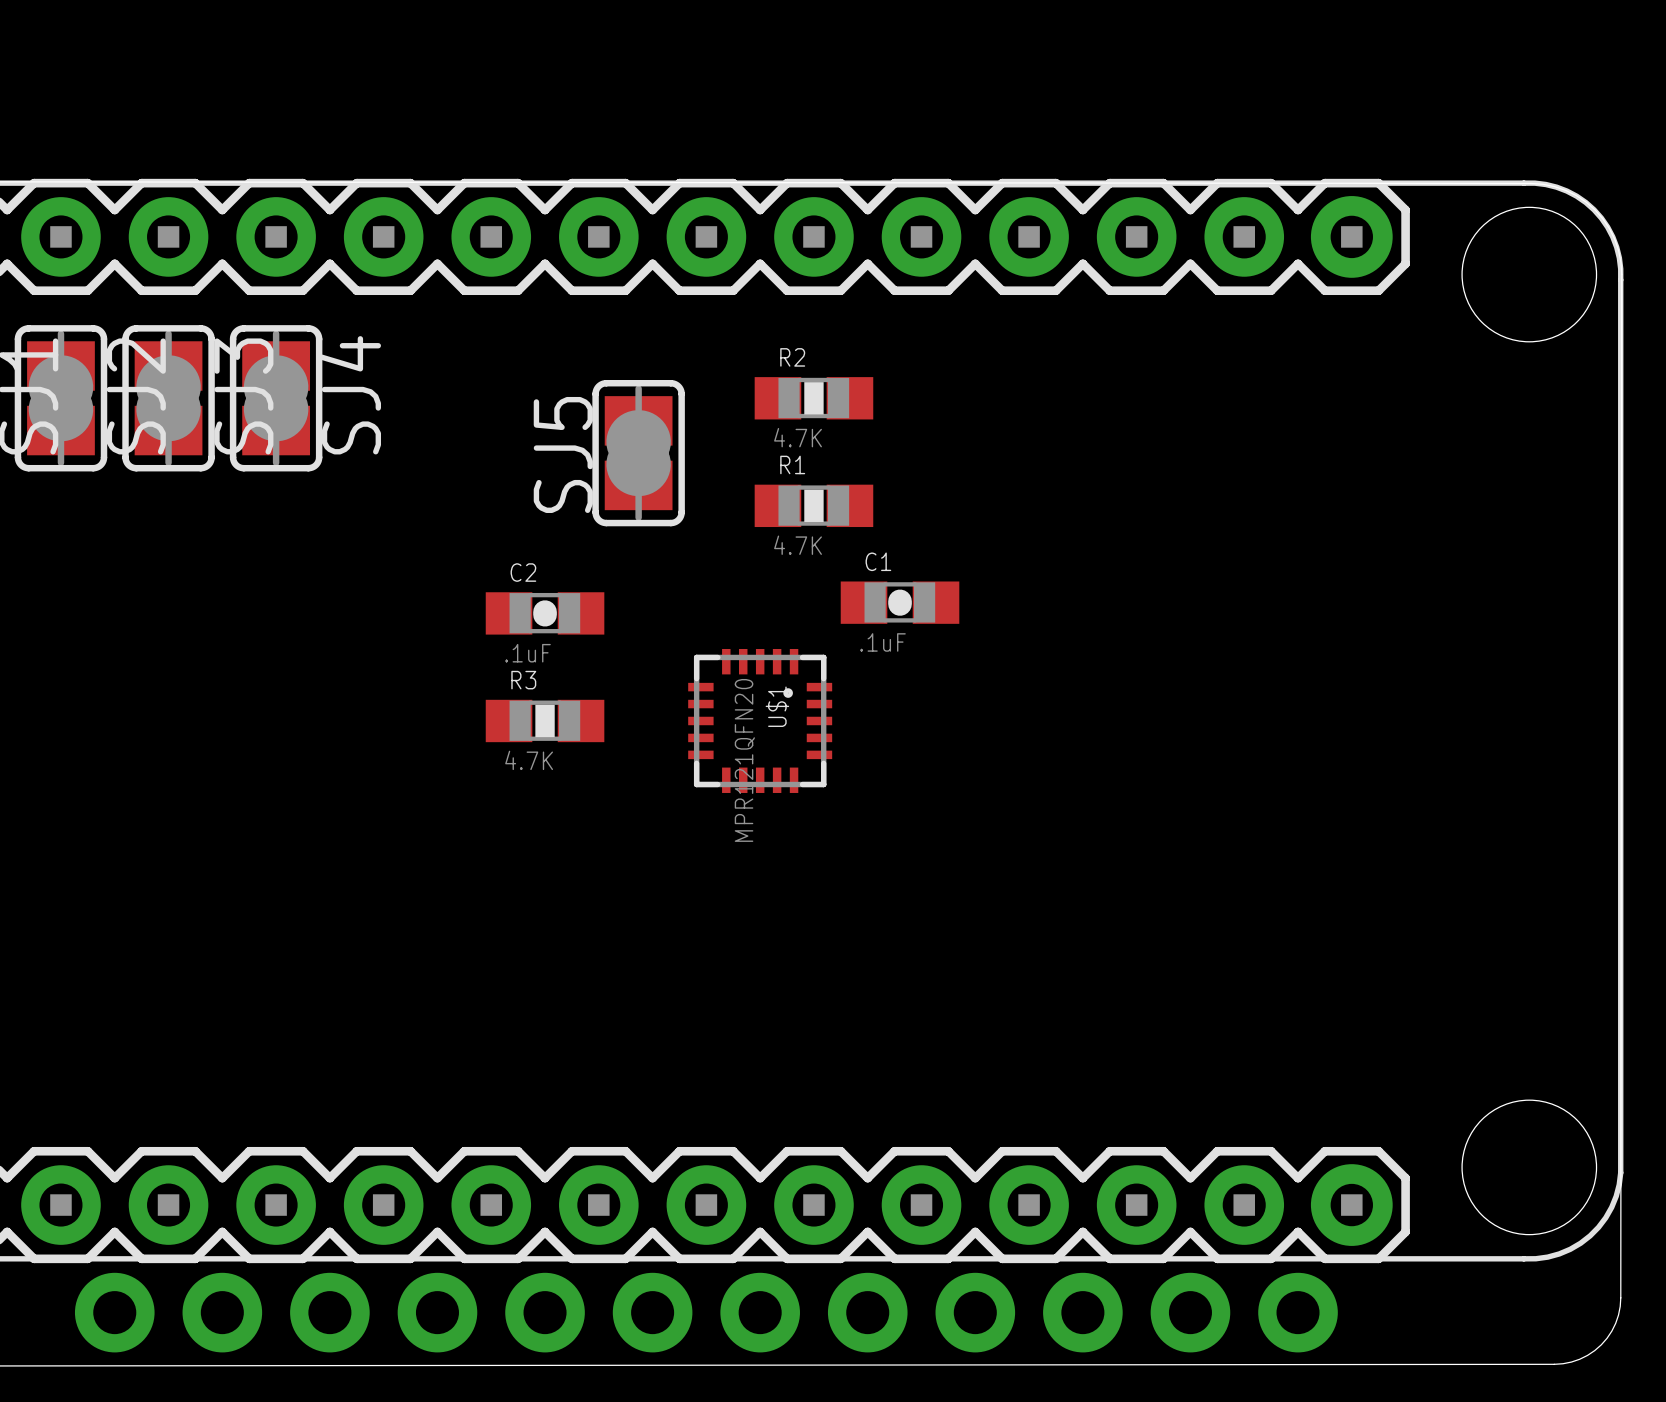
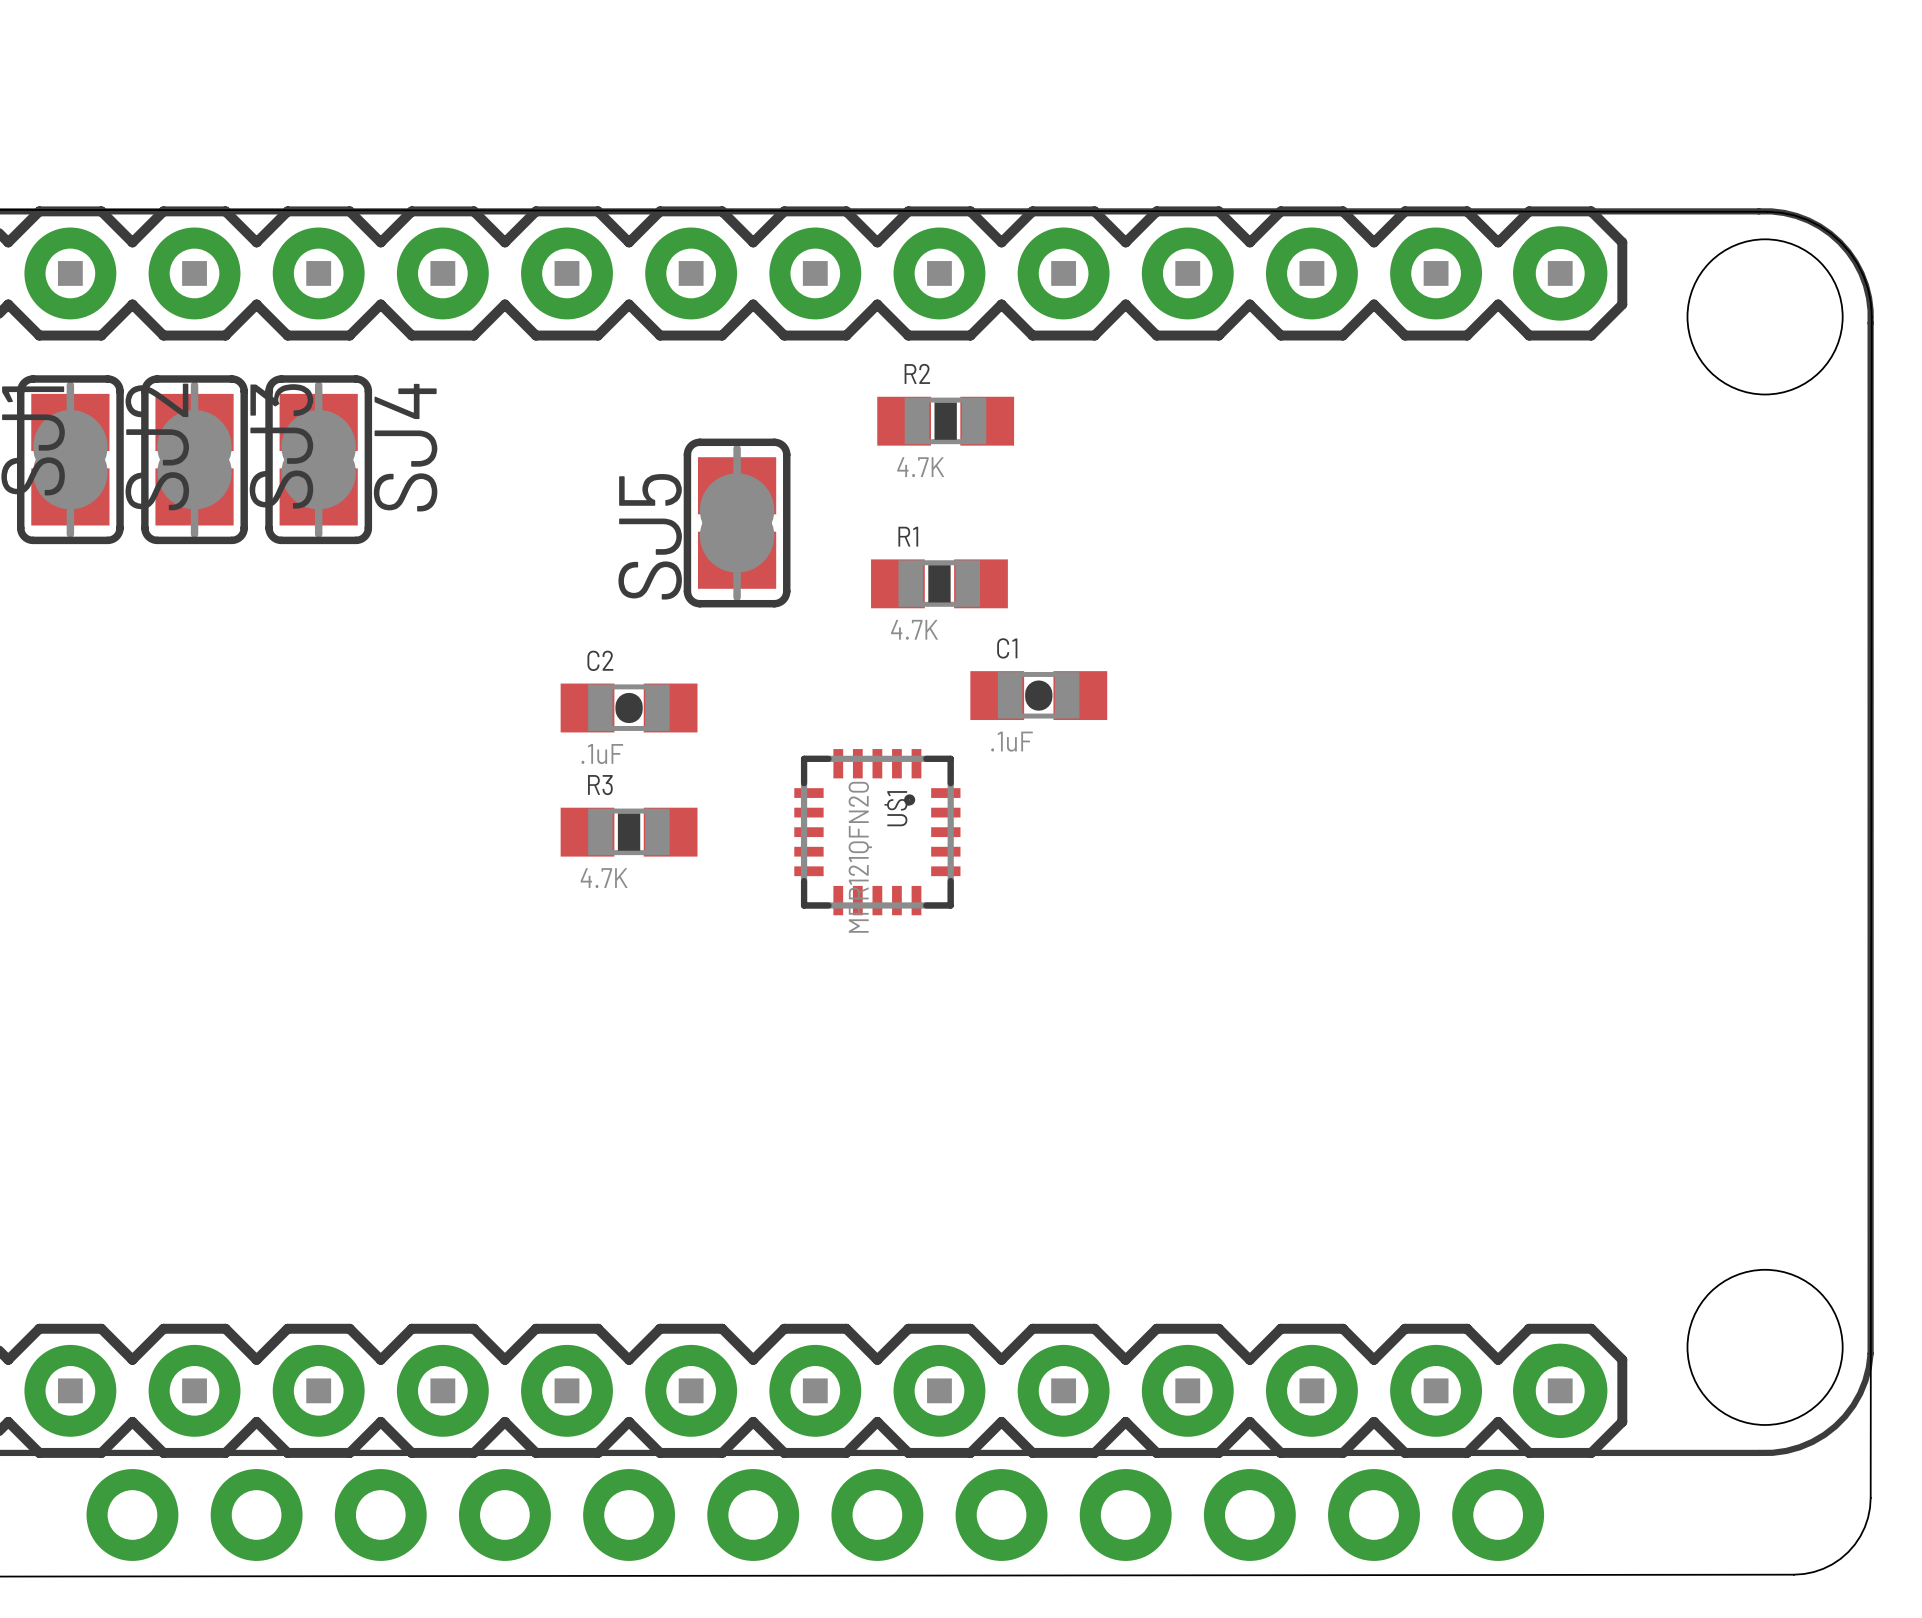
R2 position: (813, 398) -> (945, 421)

